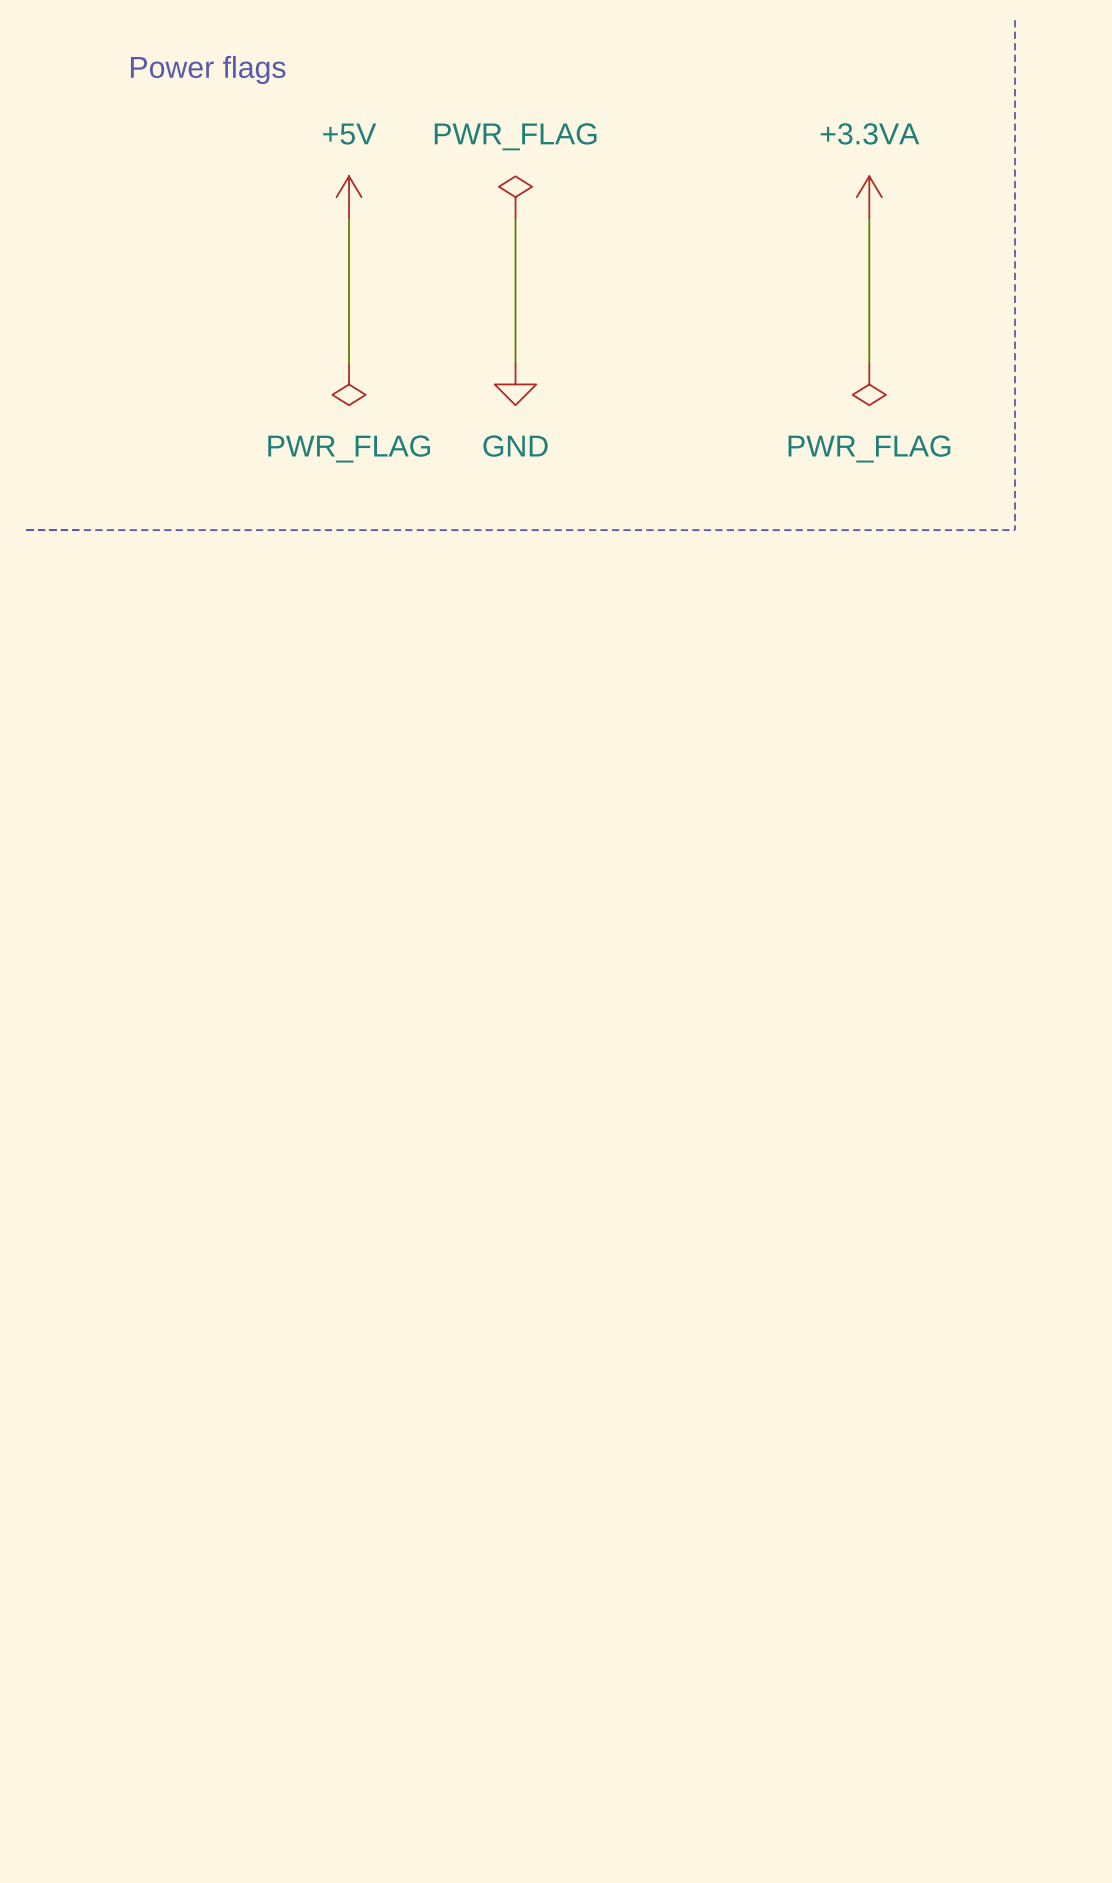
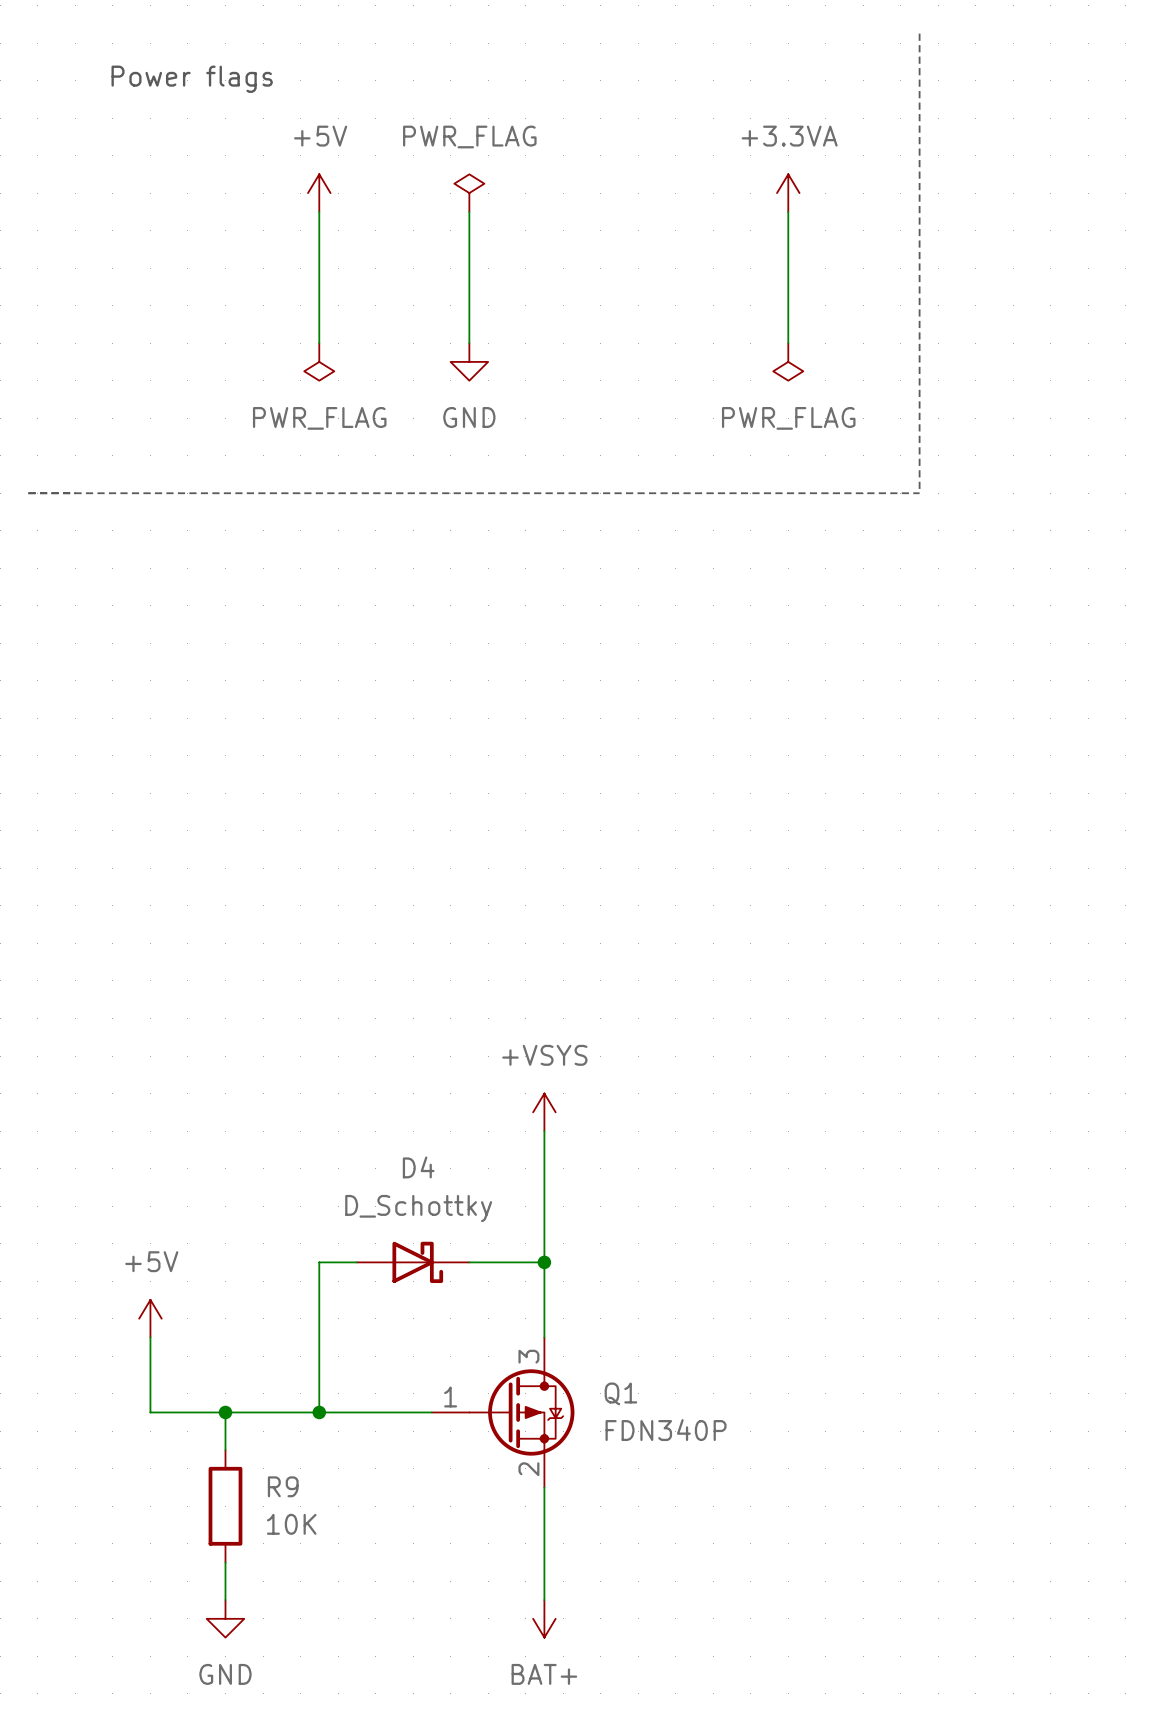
power symbol: none -> +VSYS (544, 1112)
wire: none -> (544, 1131) (544, 1337)
wire: none -> (356, 1262) (319, 1262) (319, 1412)
D4: none -> D_Schottky (413, 1262)
wire: none -> (469, 1262) (544, 1262)
junction: none -> (544, 1262)
power symbol: none -> +5V (150, 1318)
wire: none -> (150, 1337) (150, 1412) (431, 1412)
wire: none -> (225, 1412) (225, 1449)
junction: none -> (225, 1412)
junction: none -> (319, 1412)
Q1: none -> FDN340P (503, 1412)
wire: none -> (544, 1487) (544, 1600)
R9: none -> 10K (225, 1506)
wire: none -> (225, 1562) (225, 1600)
power symbol: none -> GND (225, 1618)
power symbol: none -> BAT+ (544, 1618)

